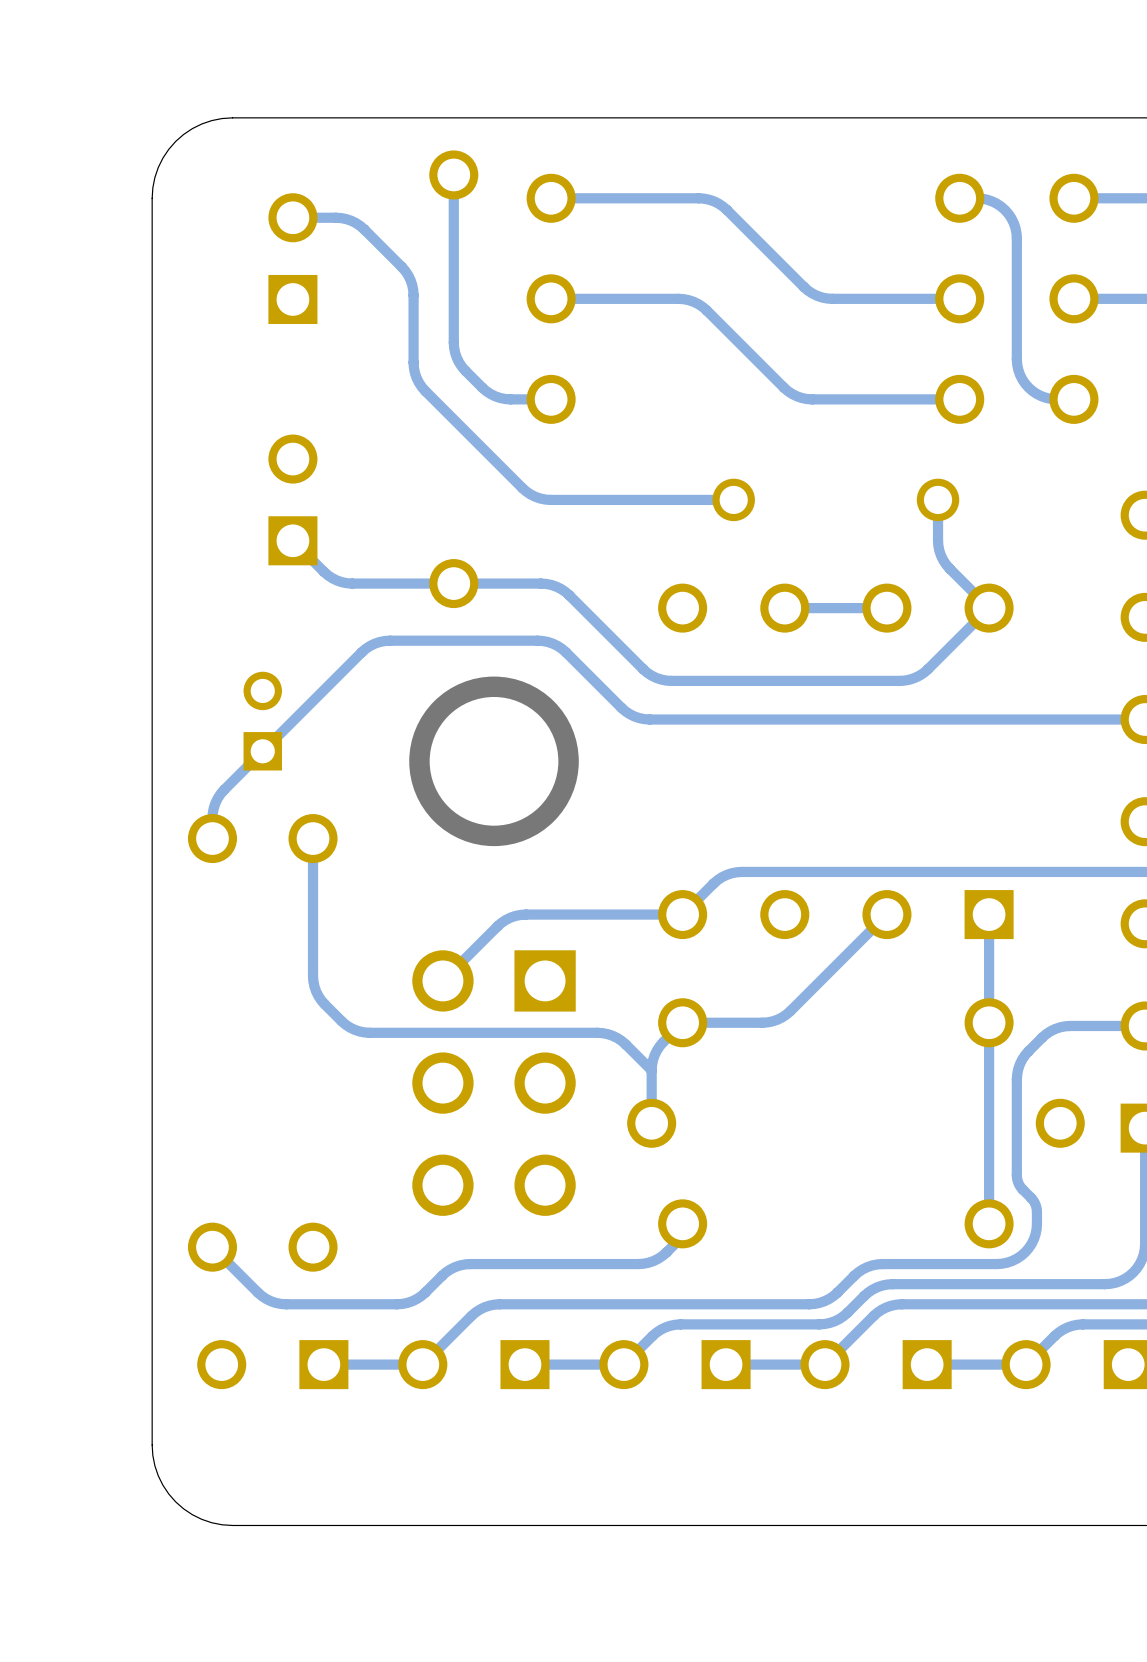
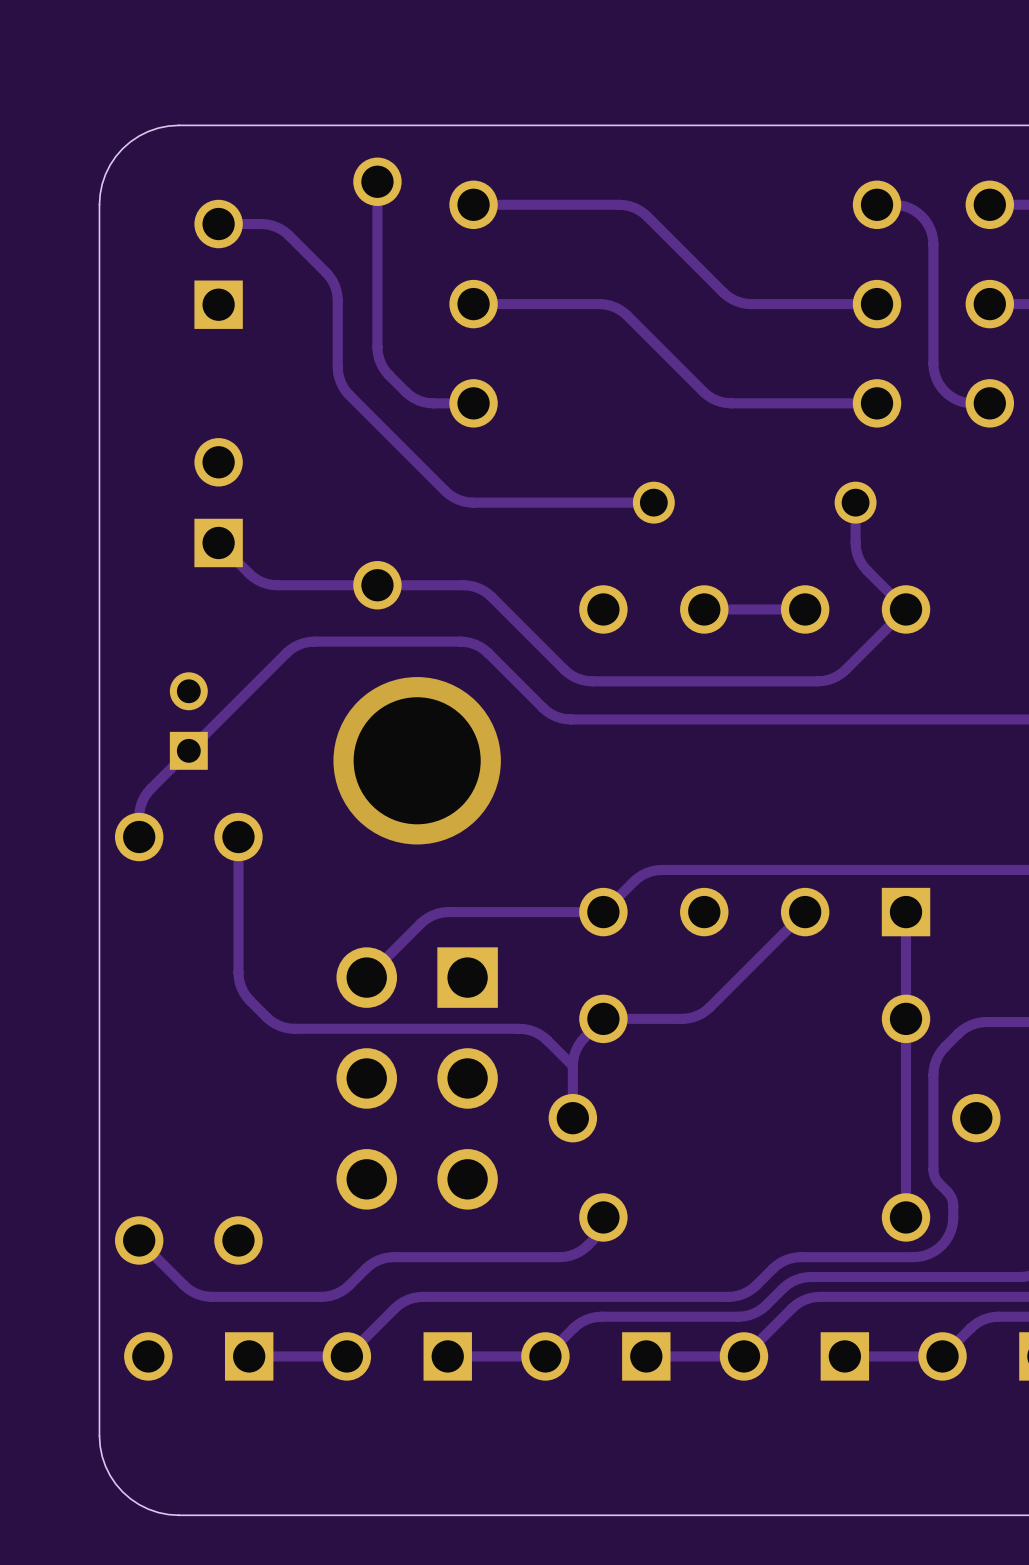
board edge: (252, 117) (211, 120) (183, 134) (168, 149) (158, 167) (152, 198) (152, 1455) (162, 1485) (183, 1508) (211, 1522) (252, 1525) -> (178, 125) (148, 131) (122, 148) (105, 174) (99, 204) (99, 1435) (105, 1466) (122, 1492) (148, 1509) (178, 1515)

